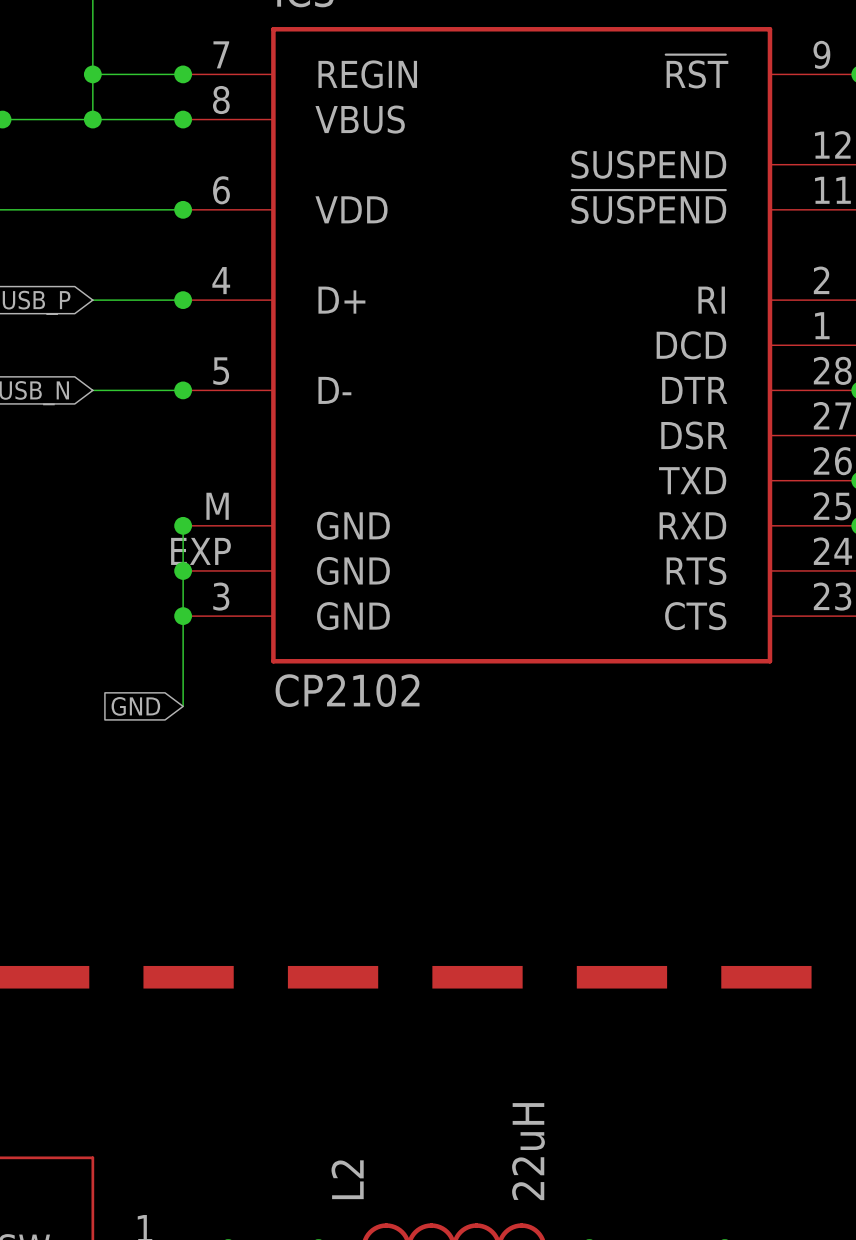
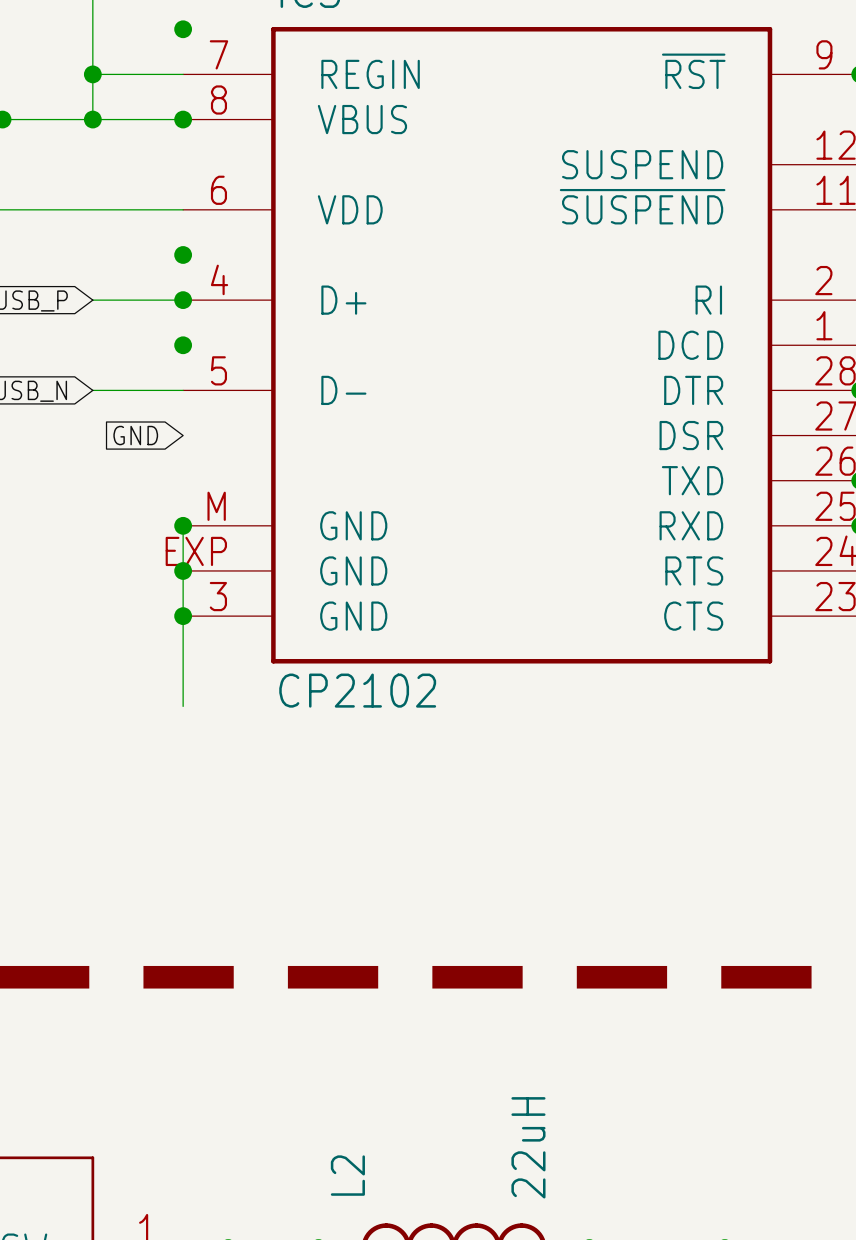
junction position: (183, 74) -> (183, 29)
junction position: (183, 209) -> (183, 254)
junction position: (183, 390) -> (183, 345)
global label: none -> GND (135, 435)
global label: GND (135, 706) -> none

